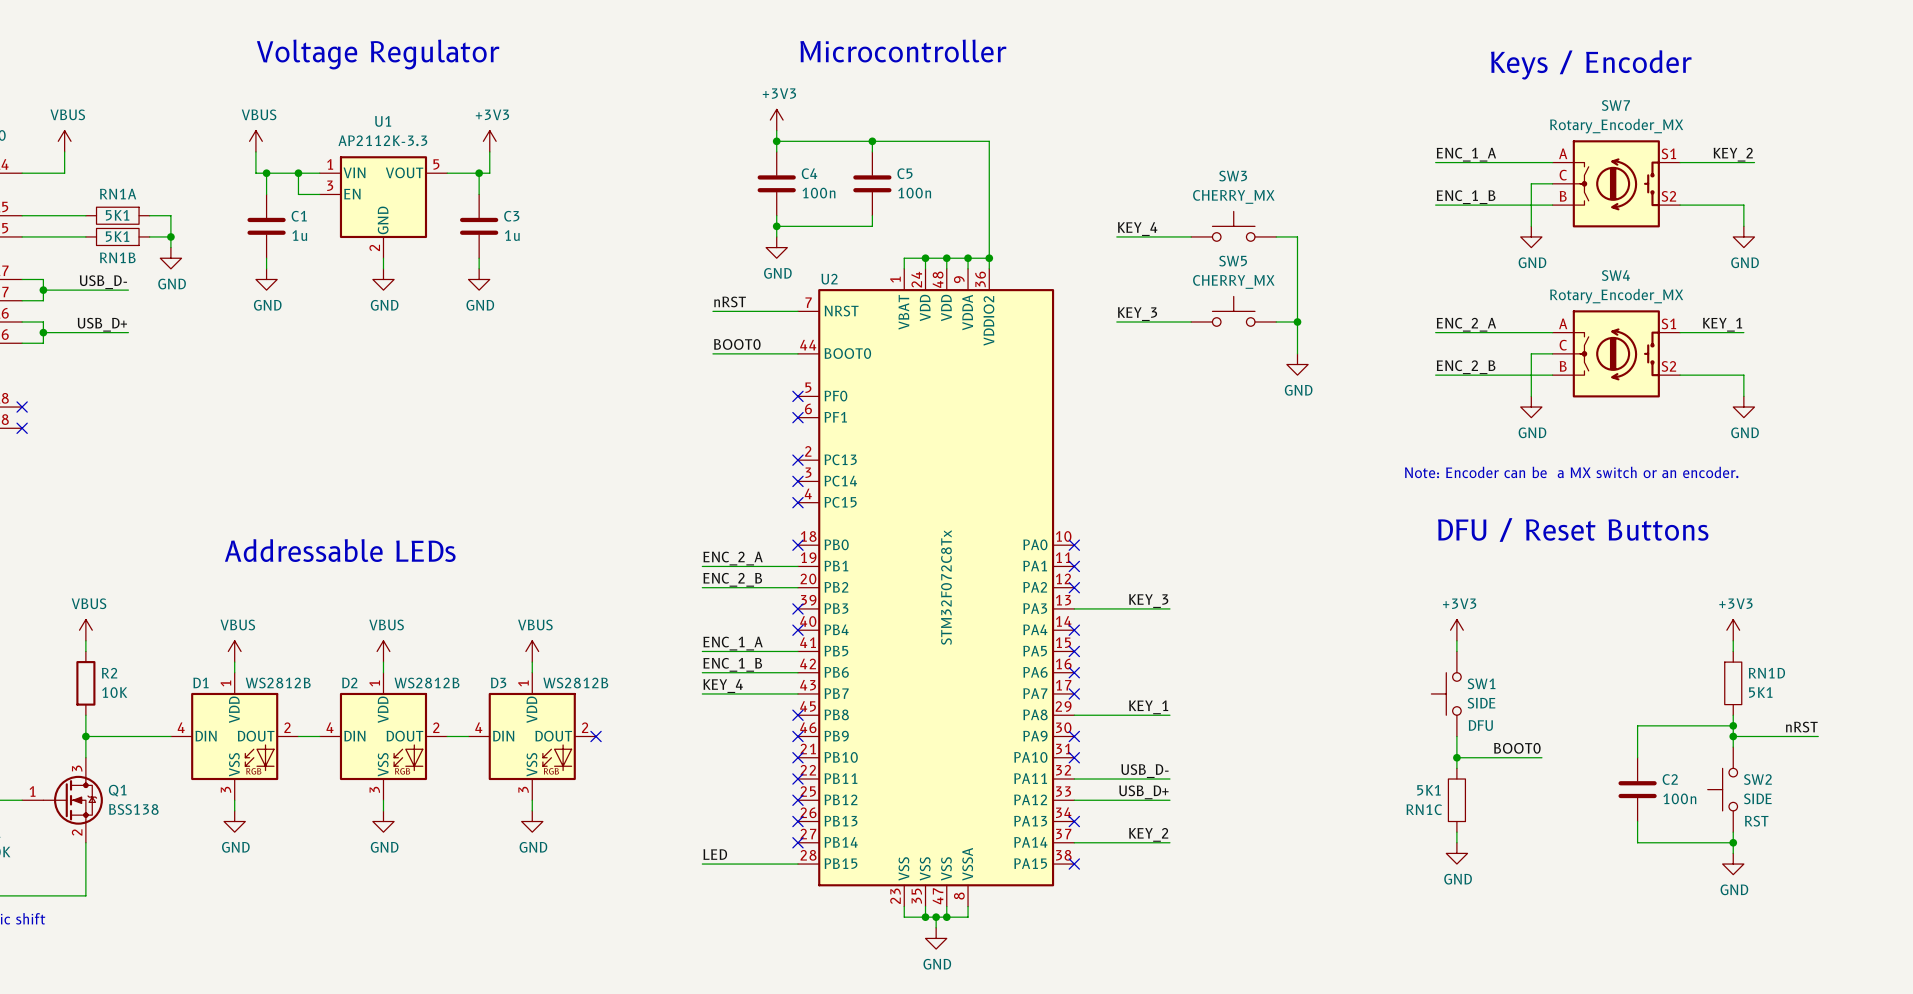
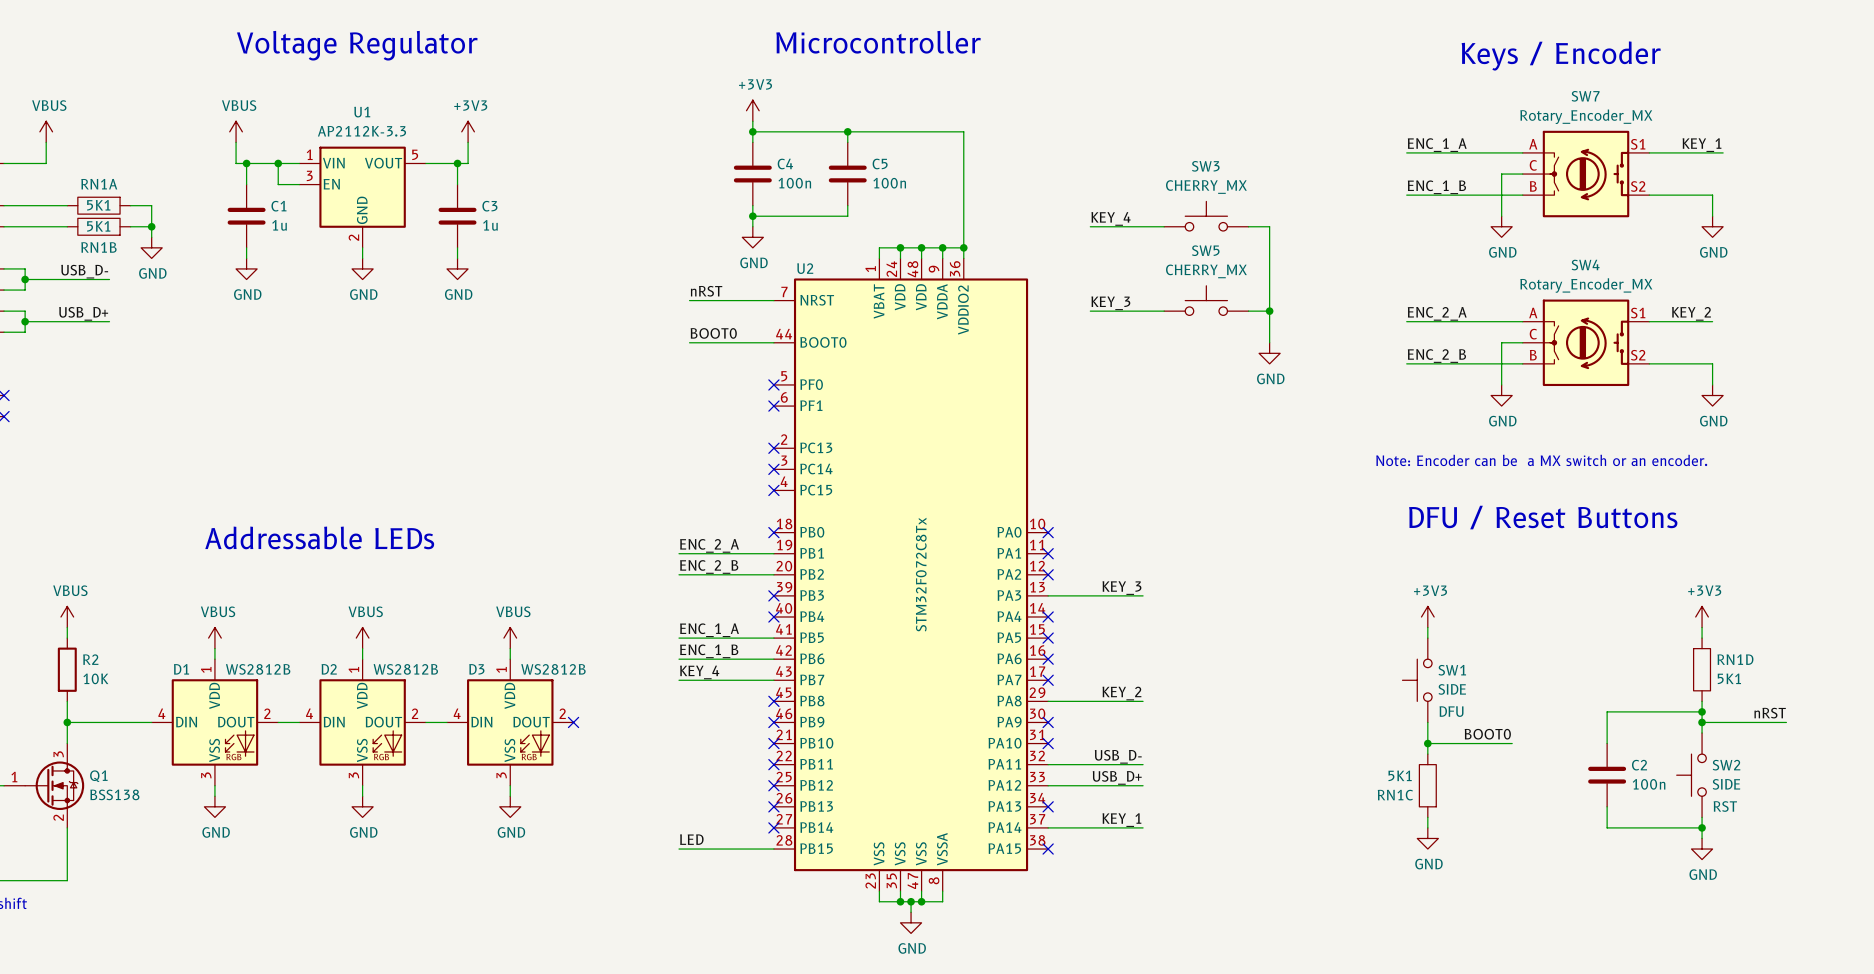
label: KEY_2 (1733, 154) -> KEY_1 (1702, 145)
label: KEY_1 (1722, 324) -> KEY_2 (1691, 313)
label: KEY_1 (1148, 707) -> KEY_2 (1121, 693)
label: KEY_2 (1148, 834) -> KEY_1 (1121, 820)

